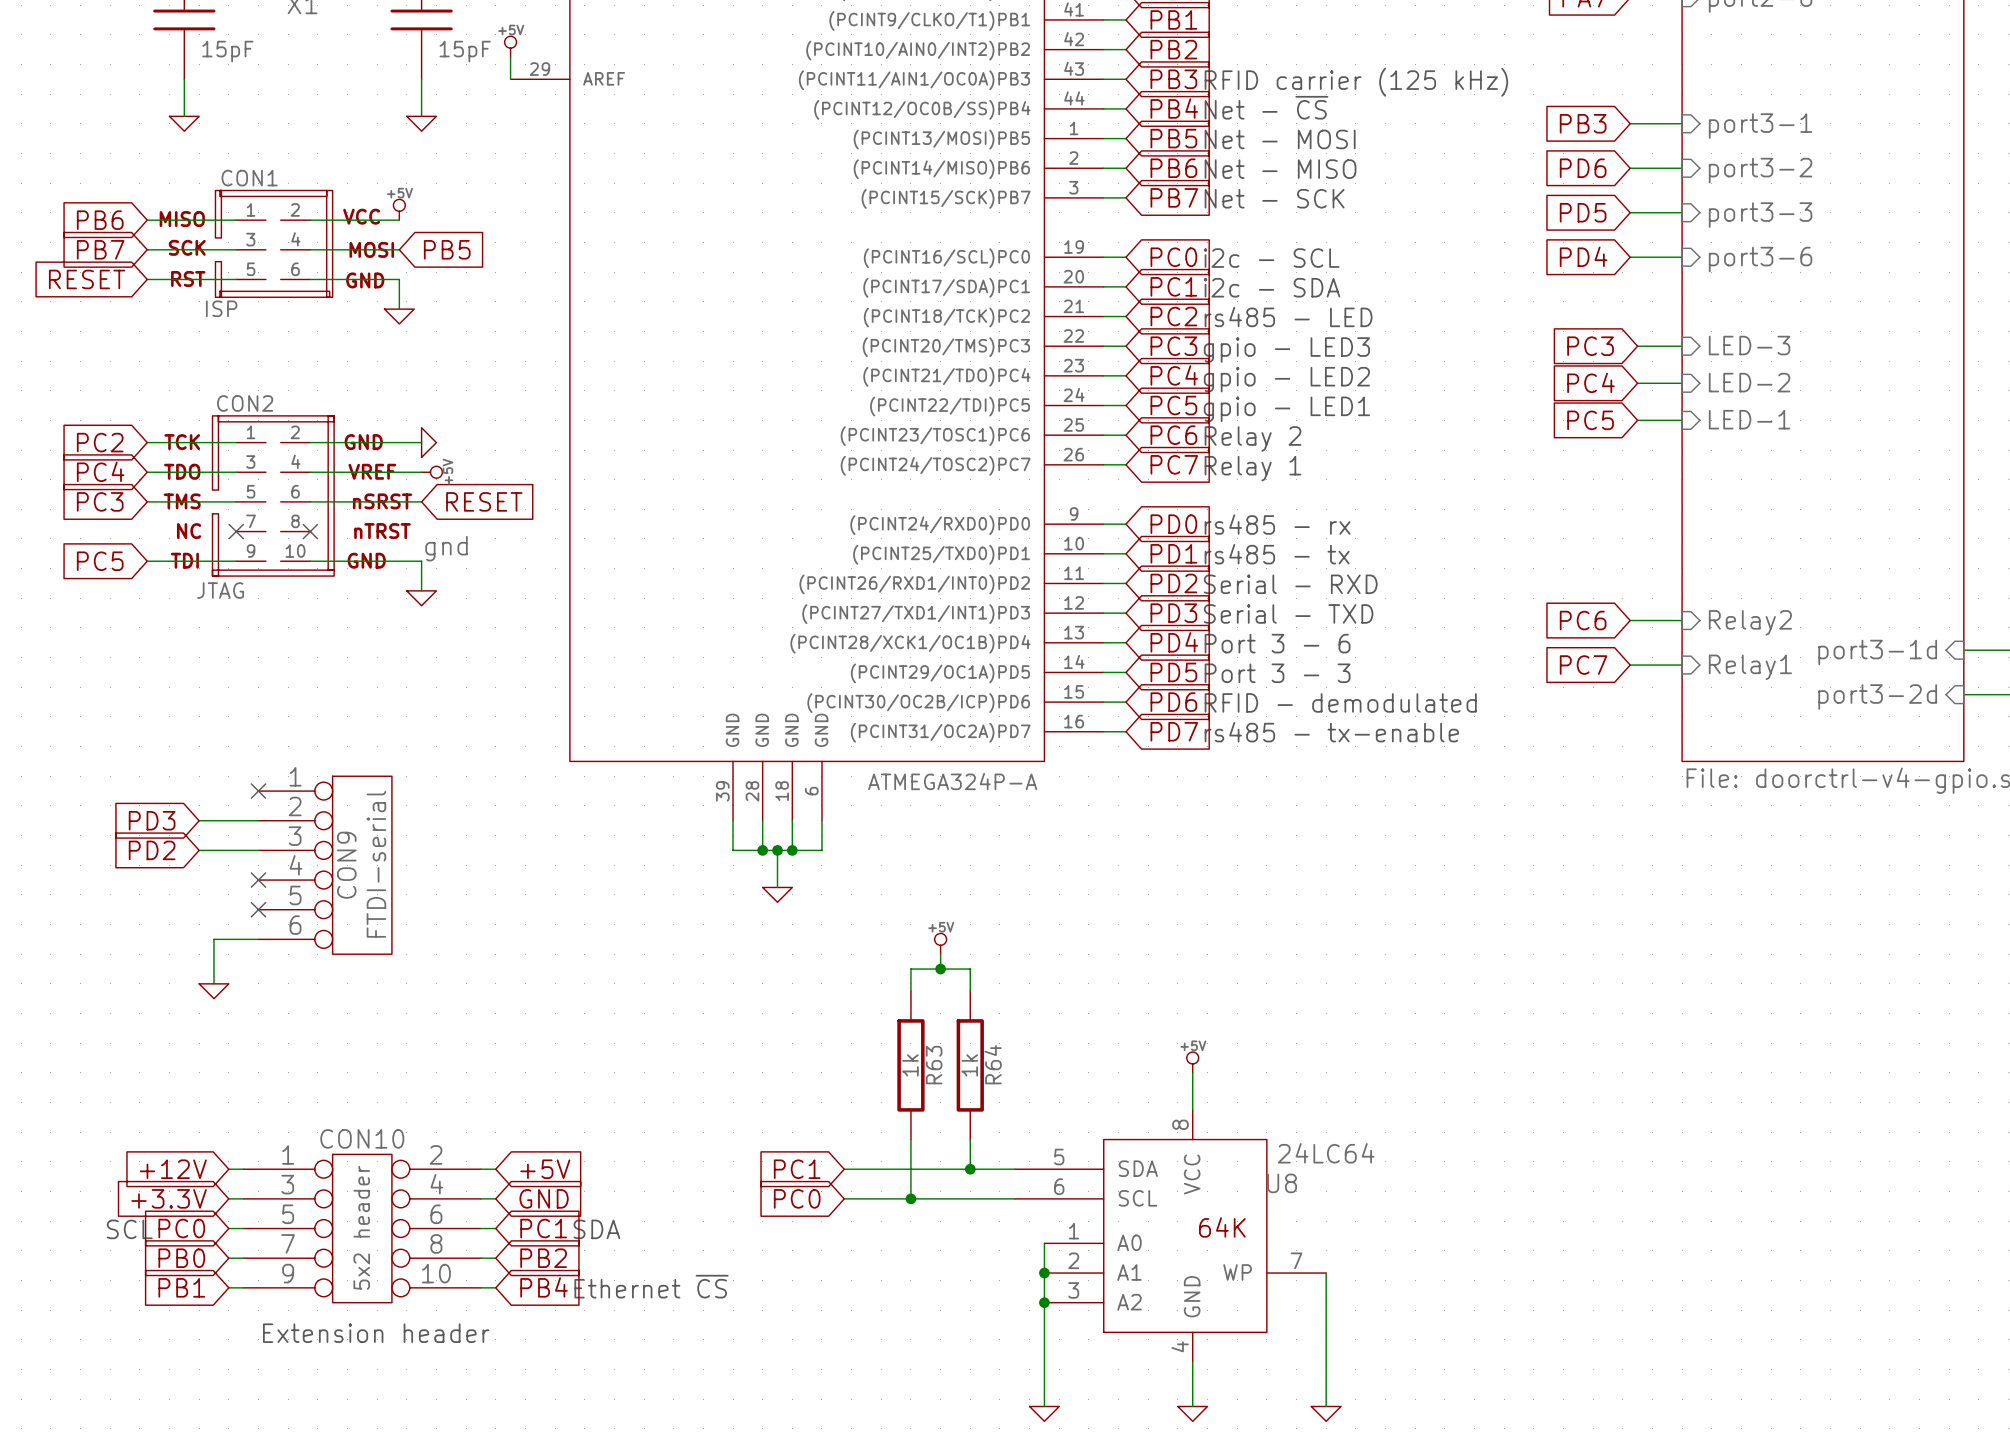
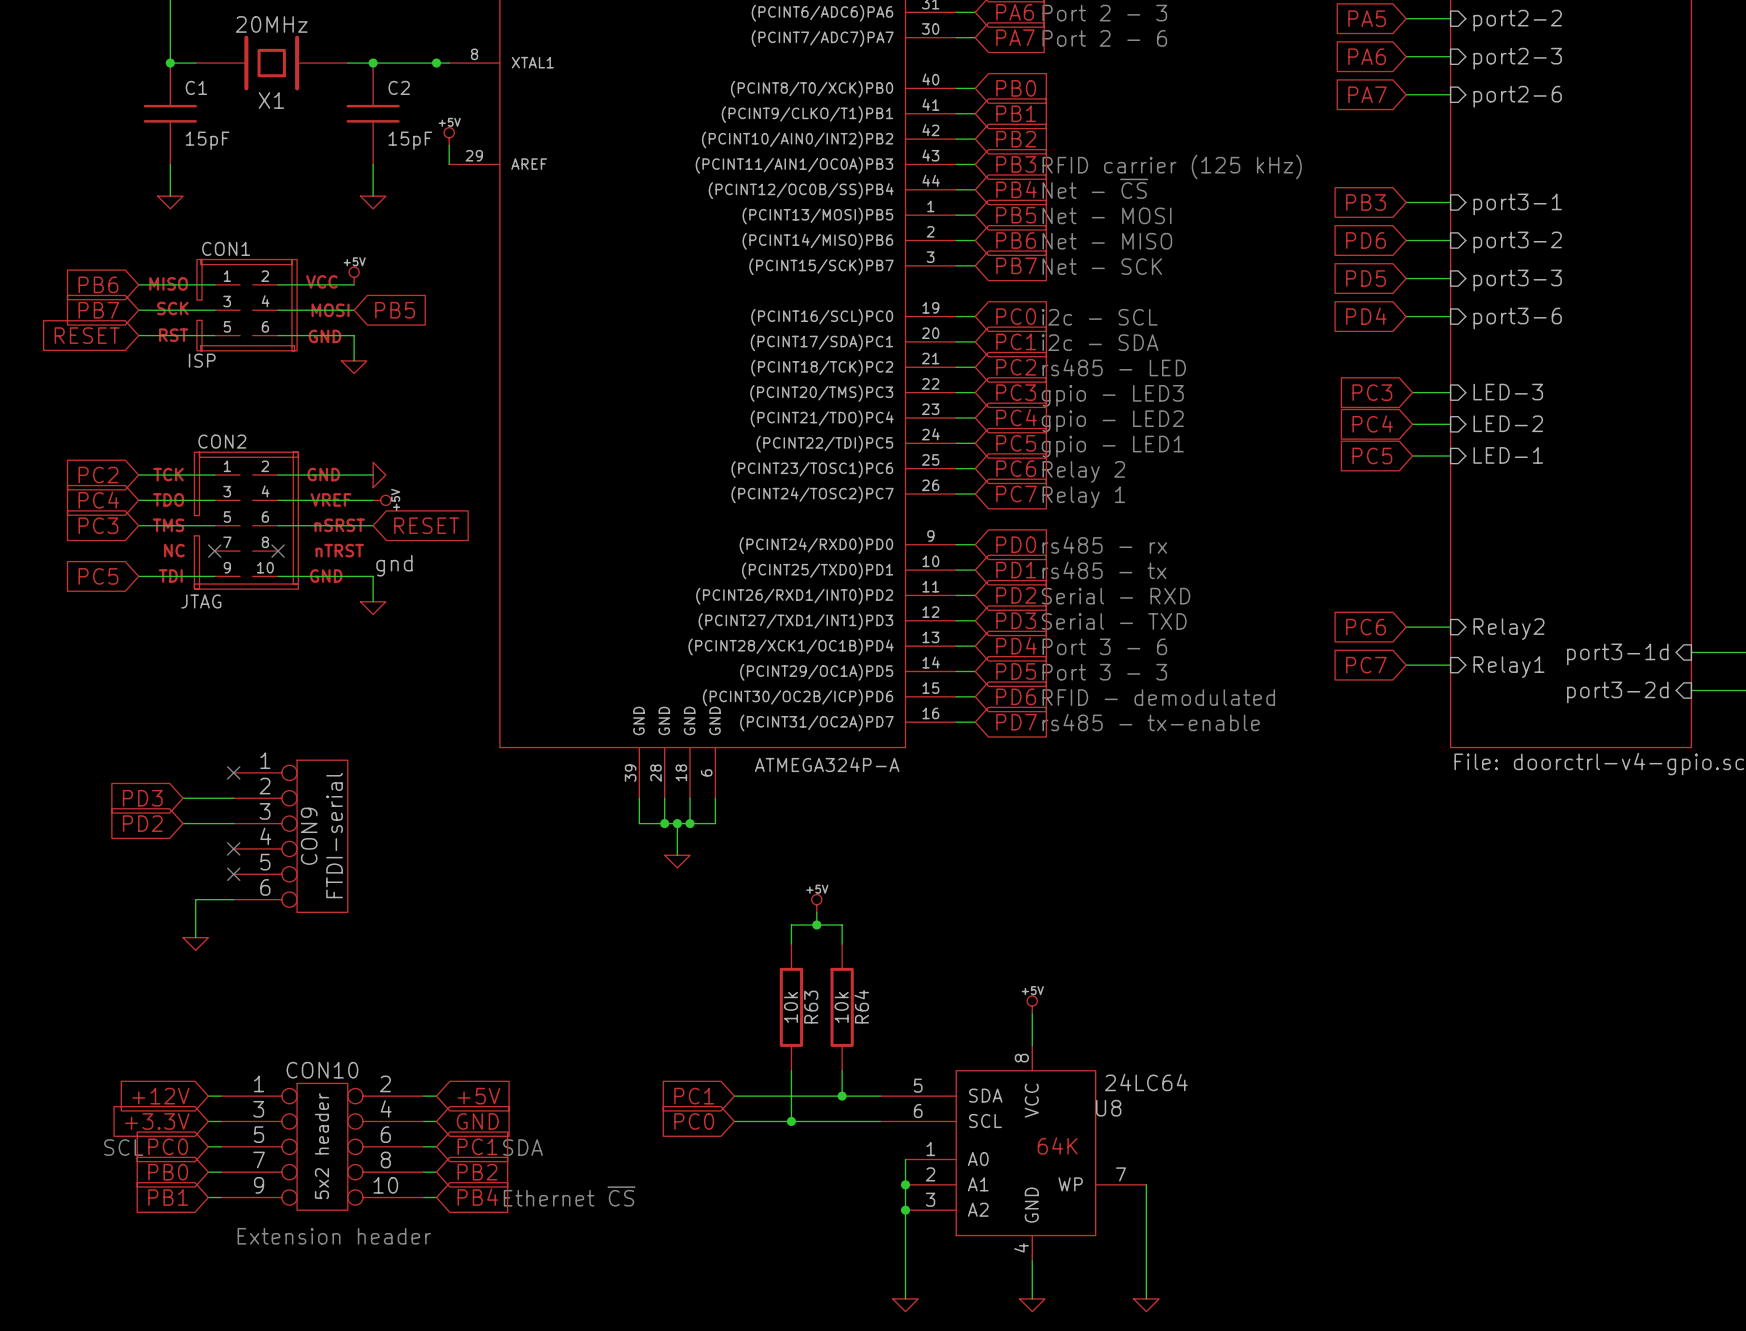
R63 value: 1k (910, 1065) -> 10k (790, 1007)
R64 value: 1k (969, 1065) -> 10k (841, 1007)

